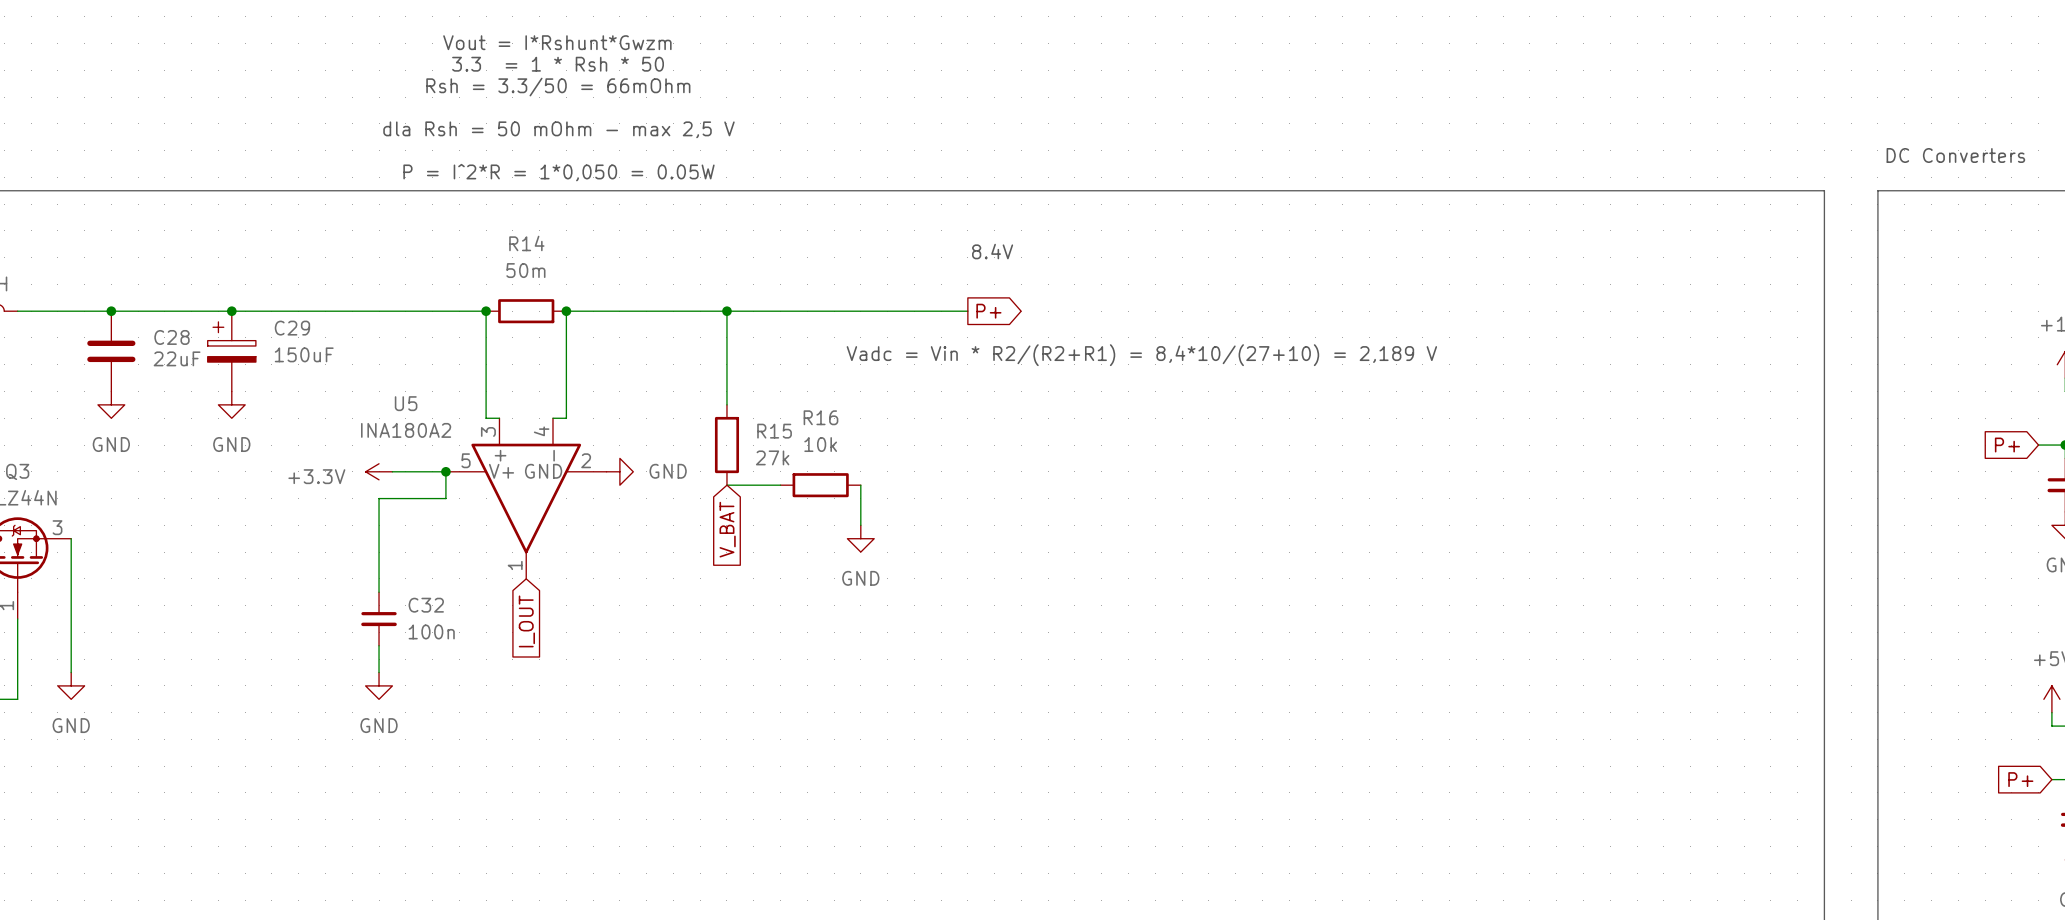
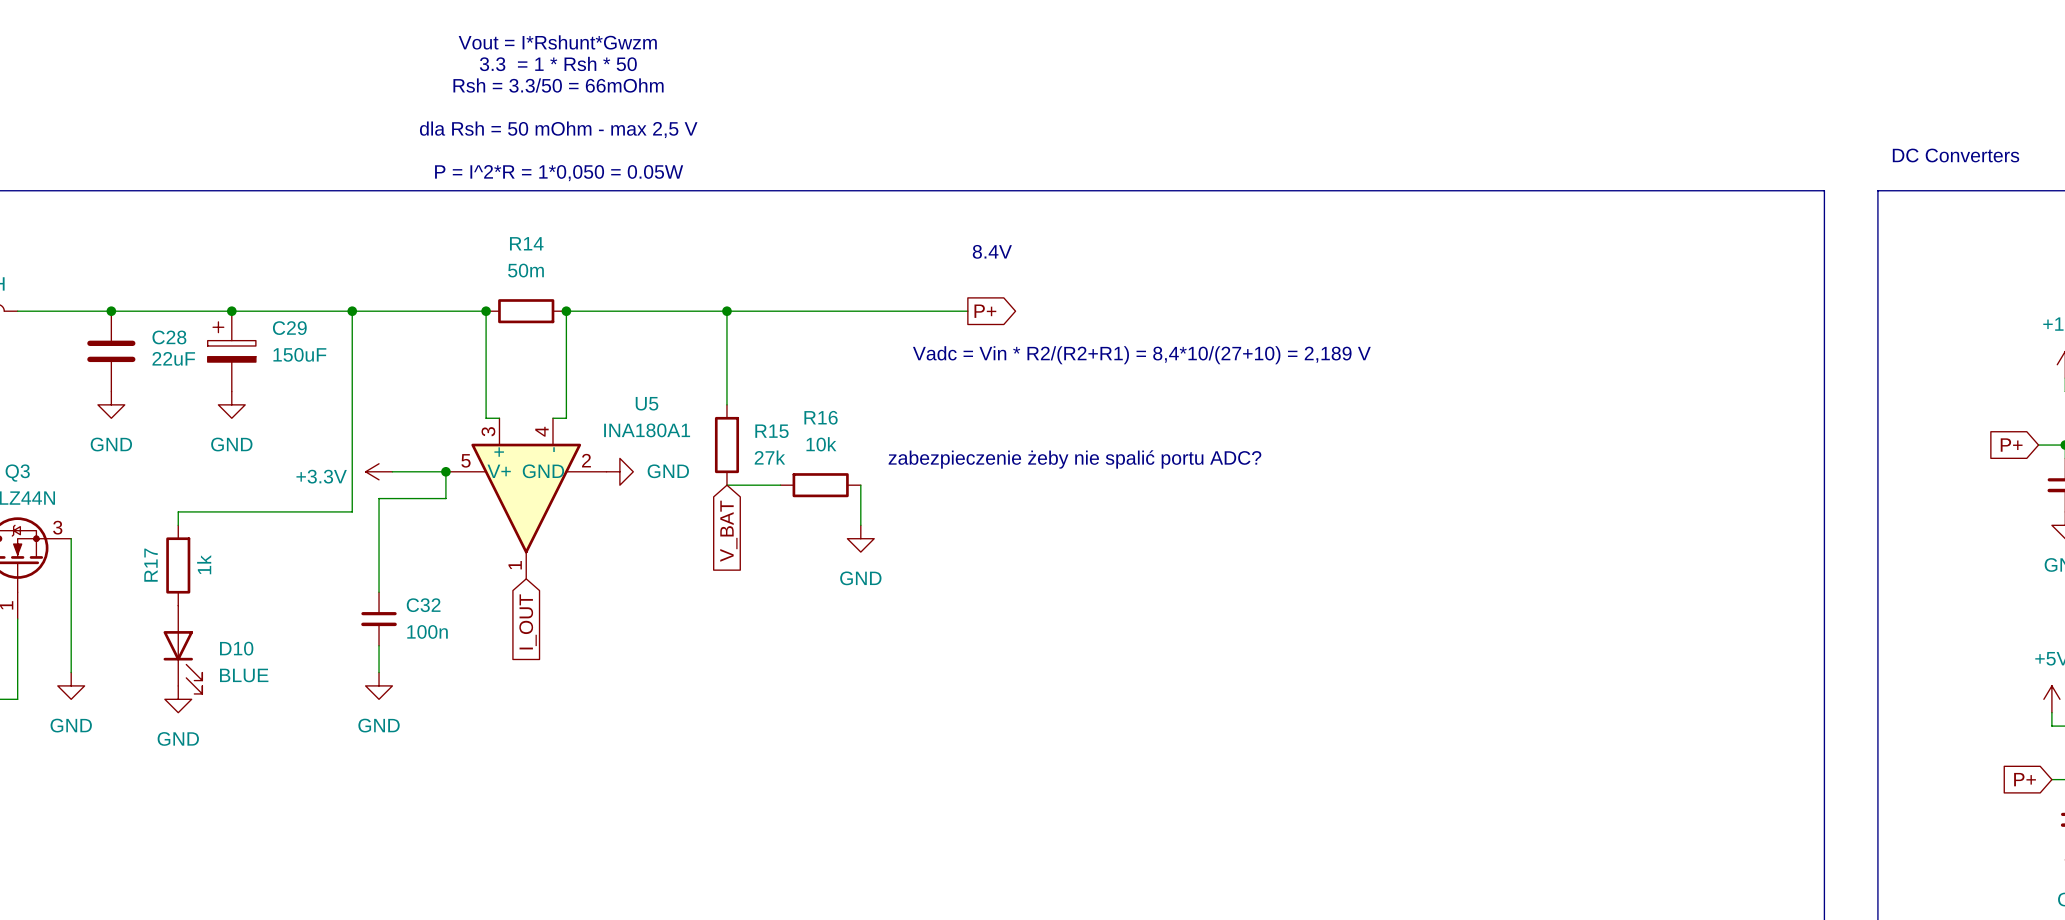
wire: none -> (352, 311) (352, 511) (178, 511) (178, 525)
junction: none -> (352, 311)
U5 name position: U5 (406, 403) -> U5 (647, 403)
U5 value: INA180A2 (406, 430) -> INA180A1 (647, 430)
text: none -> zabezpieczenie żeby nie spalić portu ADC? (1074, 459)
R17: none -> 1k (178, 565)
D10: none -> BLUE (182, 649)
power symbol: none -> GND (178, 699)

